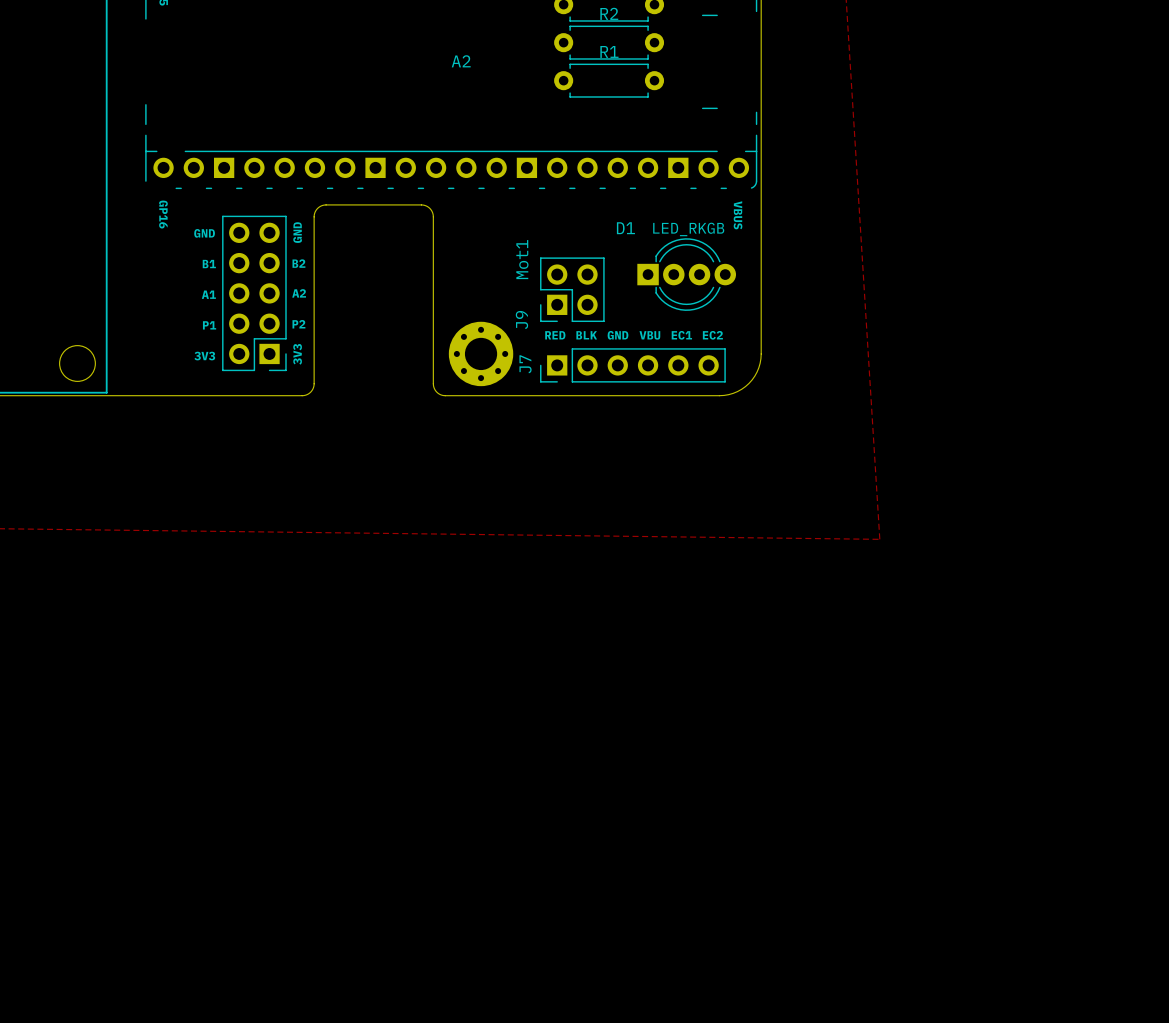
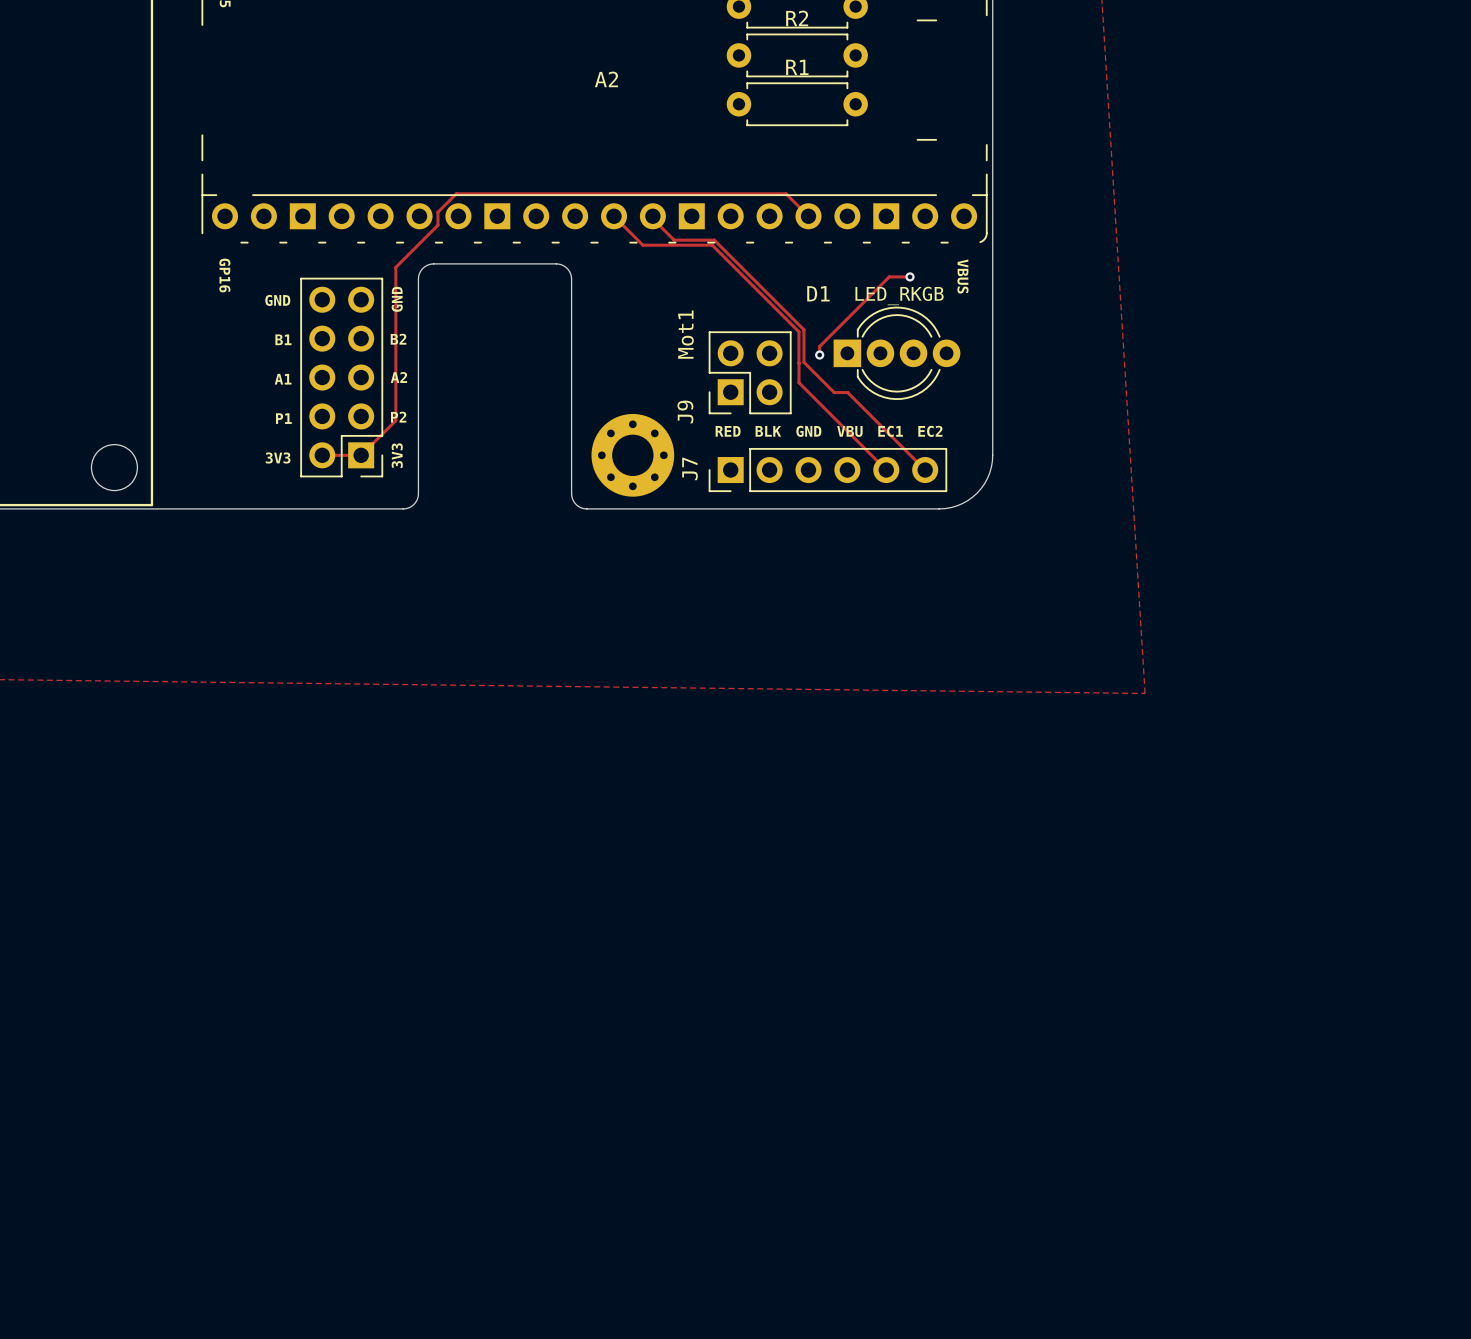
track: none -> (614, 216) (642, 245) (712, 245) (798, 331) (799, 382) (886, 470)
track: none -> (652, 216) (652, 218) (674, 240) (714, 240) (803, 329) (803, 362) (834, 392) (847, 392) (925, 470)
track: none -> (808, 216) (786, 193) (456, 193) (437, 212) (437, 225) (395, 267) (395, 420) (361, 455) (322, 455)
track: none -> (910, 276) (889, 276) (819, 346) (819, 355)
via: none -> (910, 276)
via: none -> (819, 355)

